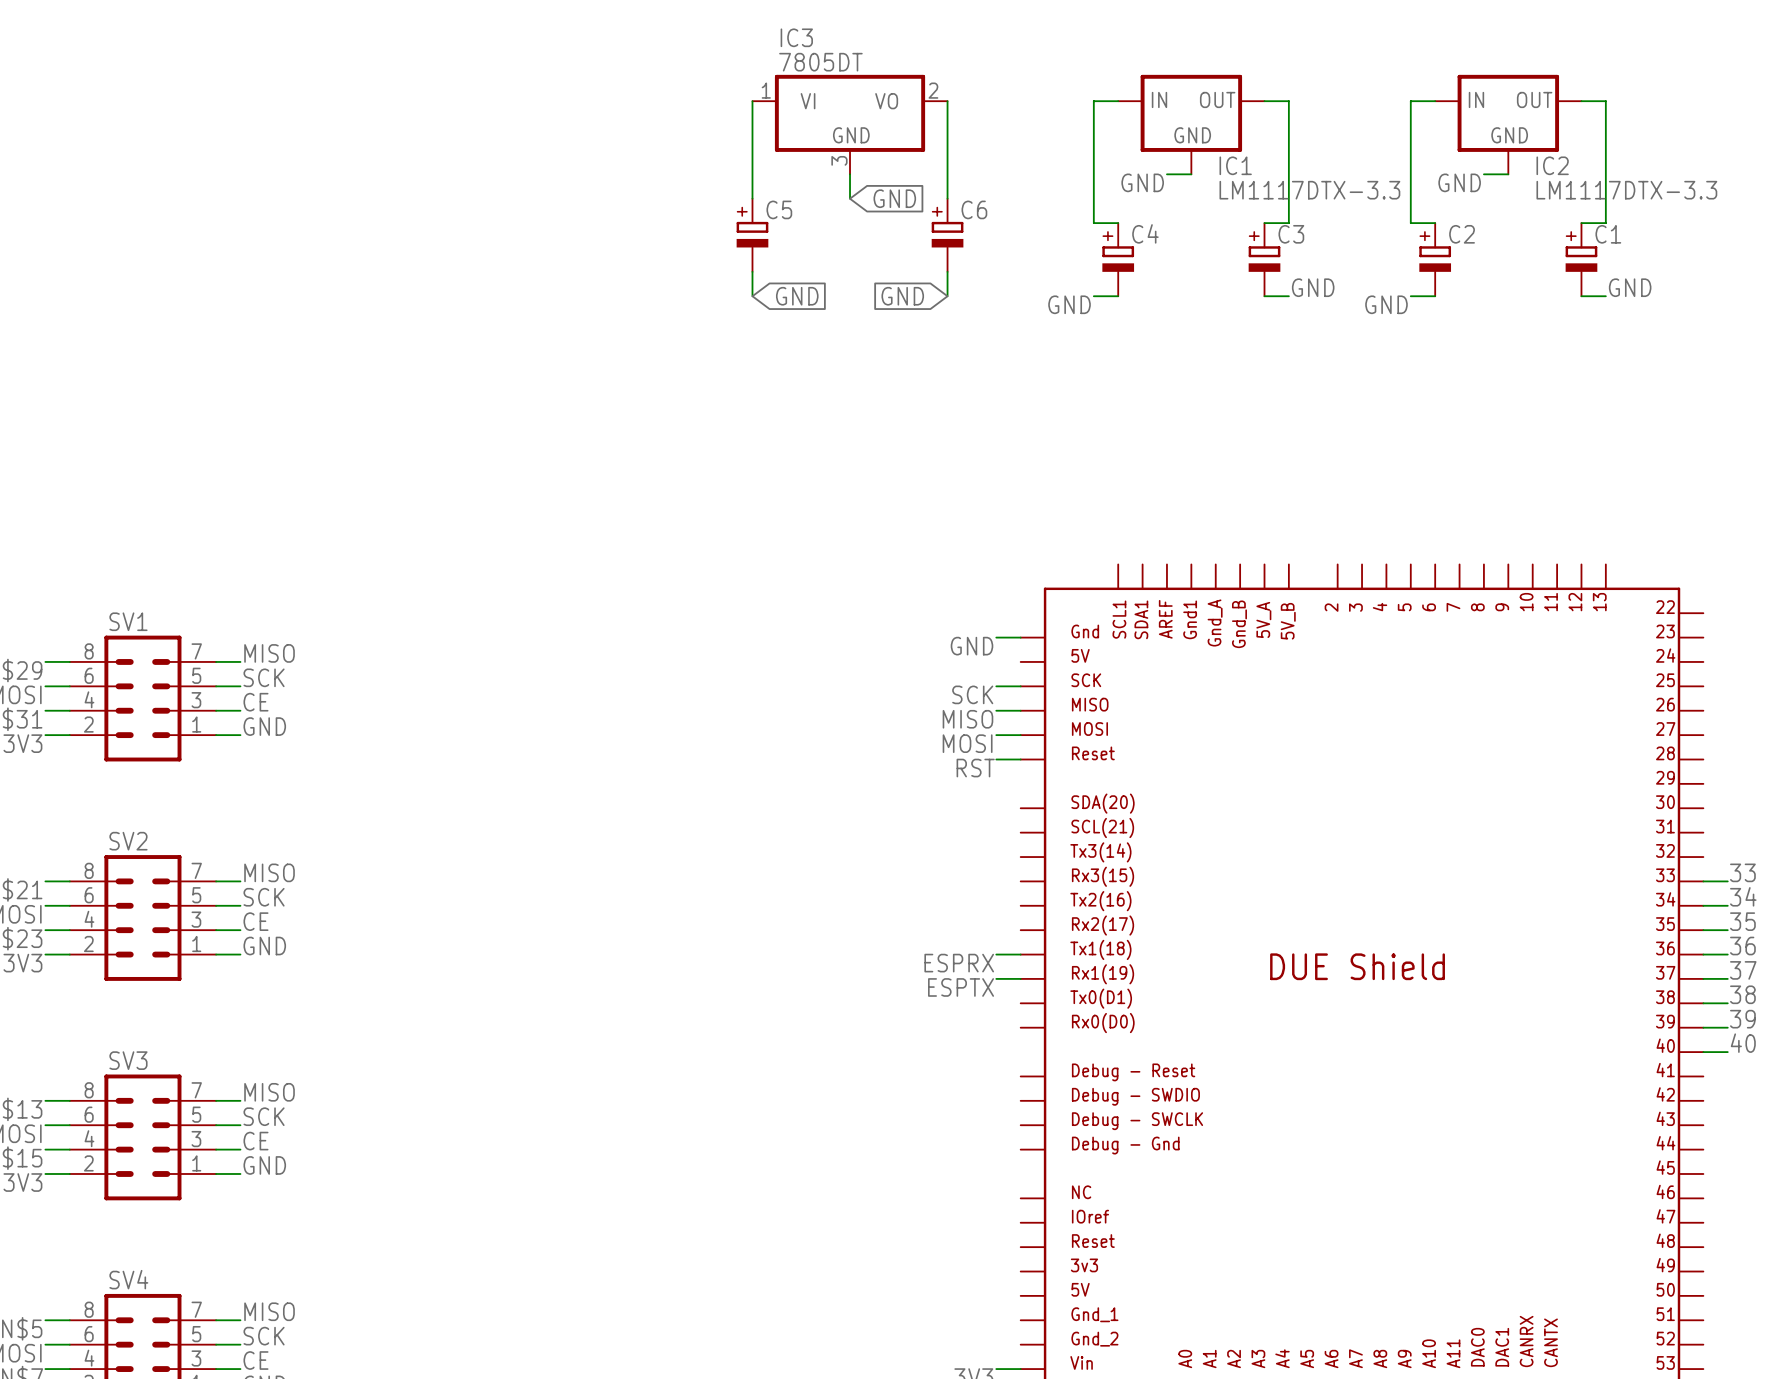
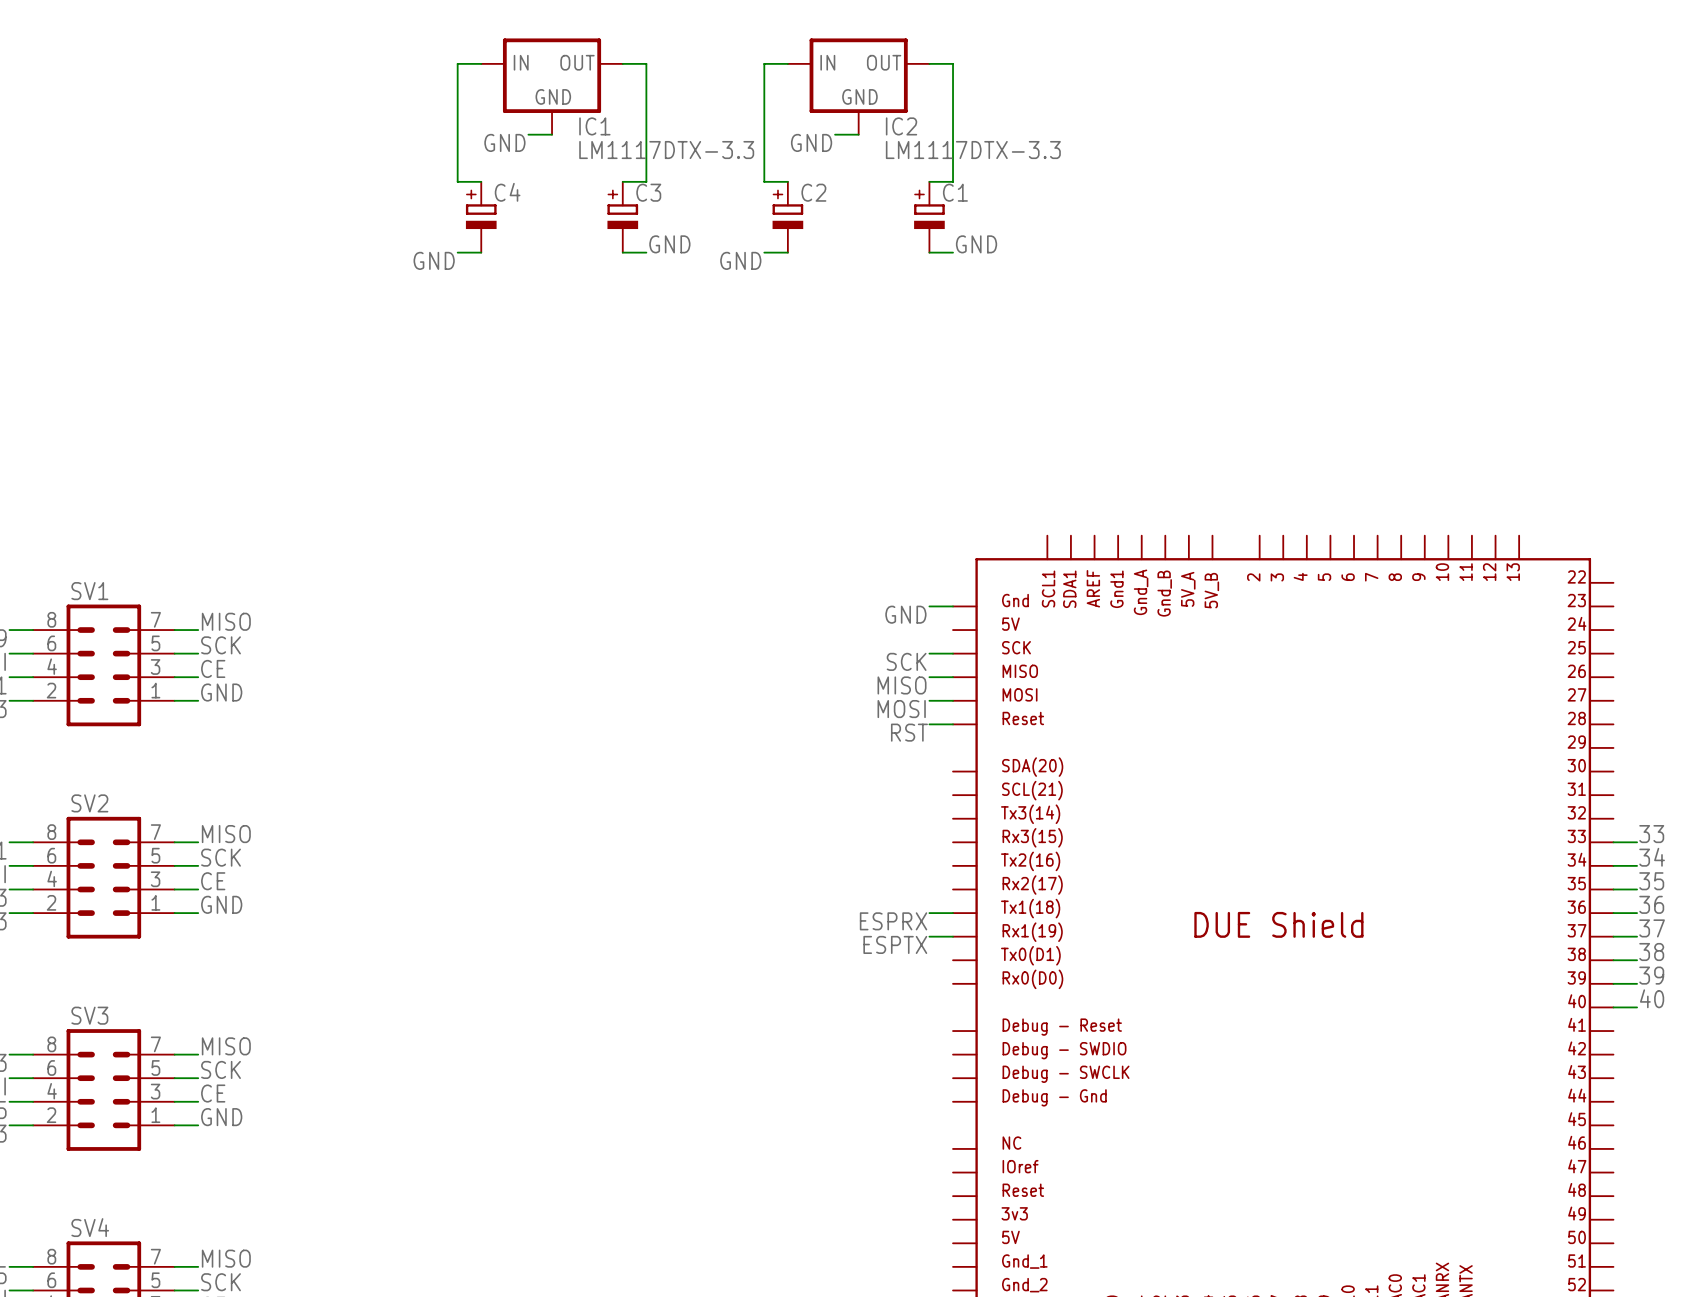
wire: none -> (481, 63) (457, 63) (457, 181) (481, 181)
wire: none -> (622, 63) (646, 63) (646, 181) (622, 181)
wire: none -> (929, 63) (953, 63) (953, 181) (929, 181)
wire: (752, 101) (752, 198) -> none
wire: (947, 101) (947, 198) -> none
wire: (1118, 101) (1093, 101) (1093, 223) (1118, 223) -> none
wire: (1264, 101) (1288, 101) (1288, 223) (1264, 223) -> none
wire: (1435, 101) (1410, 101) (1410, 223) (1435, 223) -> none
wire: (1581, 101) (1605, 101) (1605, 223) (1581, 223) -> none
IC3: 7805DT (850, 124) -> none
IC1 position: (1191, 124) -> (552, 86)
IC2 position: (1508, 124) -> (858, 86)
wire: none -> (528, 134) (552, 134)
label: none -> GND (504, 142)
label: none -> GND (811, 142)
wire: (850, 174) (850, 198) -> (787, 63) (764, 63) (764, 181) (787, 181)
wire: (1166, 174) (1191, 174) -> none
wire: (1483, 174) (1508, 174) -> none
label: GND (1142, 182) -> none
label: GND (1459, 182) -> none
global label: GND (894, 198) -> none
C5: (752, 235) -> none
C6: (947, 235) -> none
C4 position: (1118, 259) -> (481, 217)
C3 position: (1264, 259) -> (622, 217)
C2 position: (1435, 259) -> (787, 217)
C1 position: (1581, 259) -> (929, 217)
label: none -> GND (669, 244)
wire: none -> (457, 252) (481, 252)
wire: none -> (622, 252) (646, 252)
wire: (752, 271) (752, 296) -> none
wire: none -> (764, 252) (787, 252)
wire: (947, 271) (947, 296) -> none
label: none -> GND (434, 260)
label: none -> GND (740, 260)
label: GND (1313, 287) -> none
label: GND (1630, 287) -> none
global label: GND (797, 296) -> none
global label: GND (902, 296) -> none
wire: (1093, 296) (1118, 296) -> (929, 252) (953, 252)
wire: (1264, 296) (1288, 296) -> none
wire: (1410, 296) (1435, 296) -> none
wire: (1581, 296) (1605, 296) -> none
label position: GND (1069, 304) -> GND (976, 244)
label: GND (1386, 304) -> none

